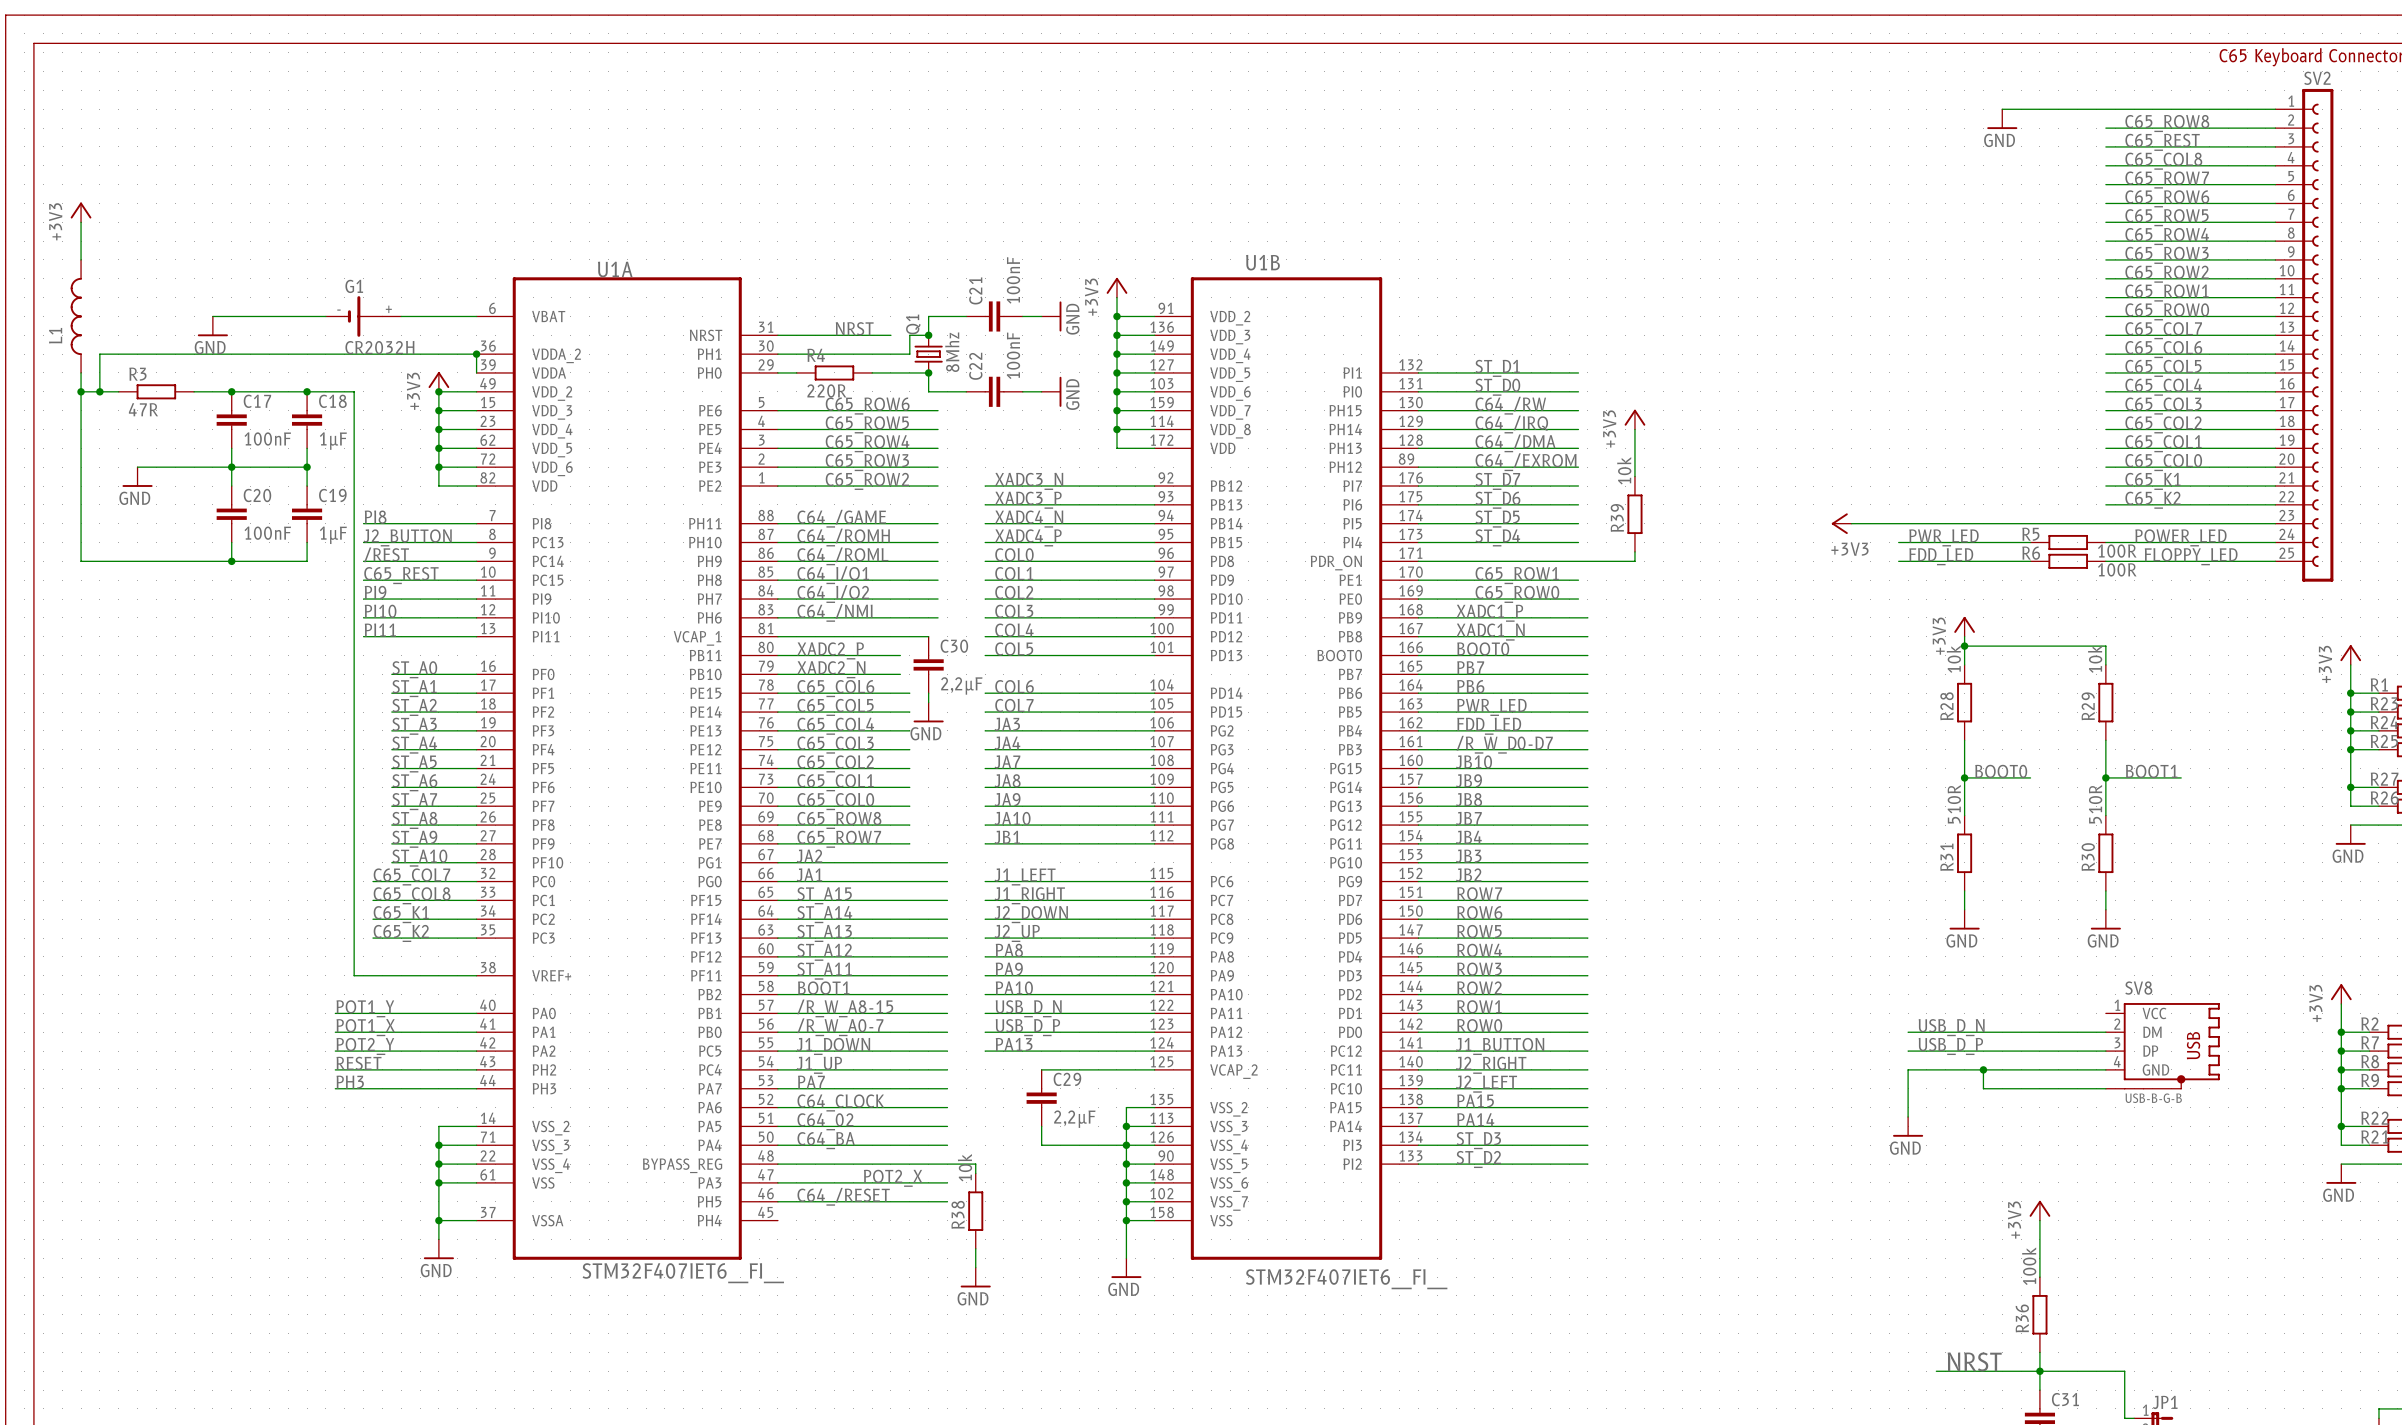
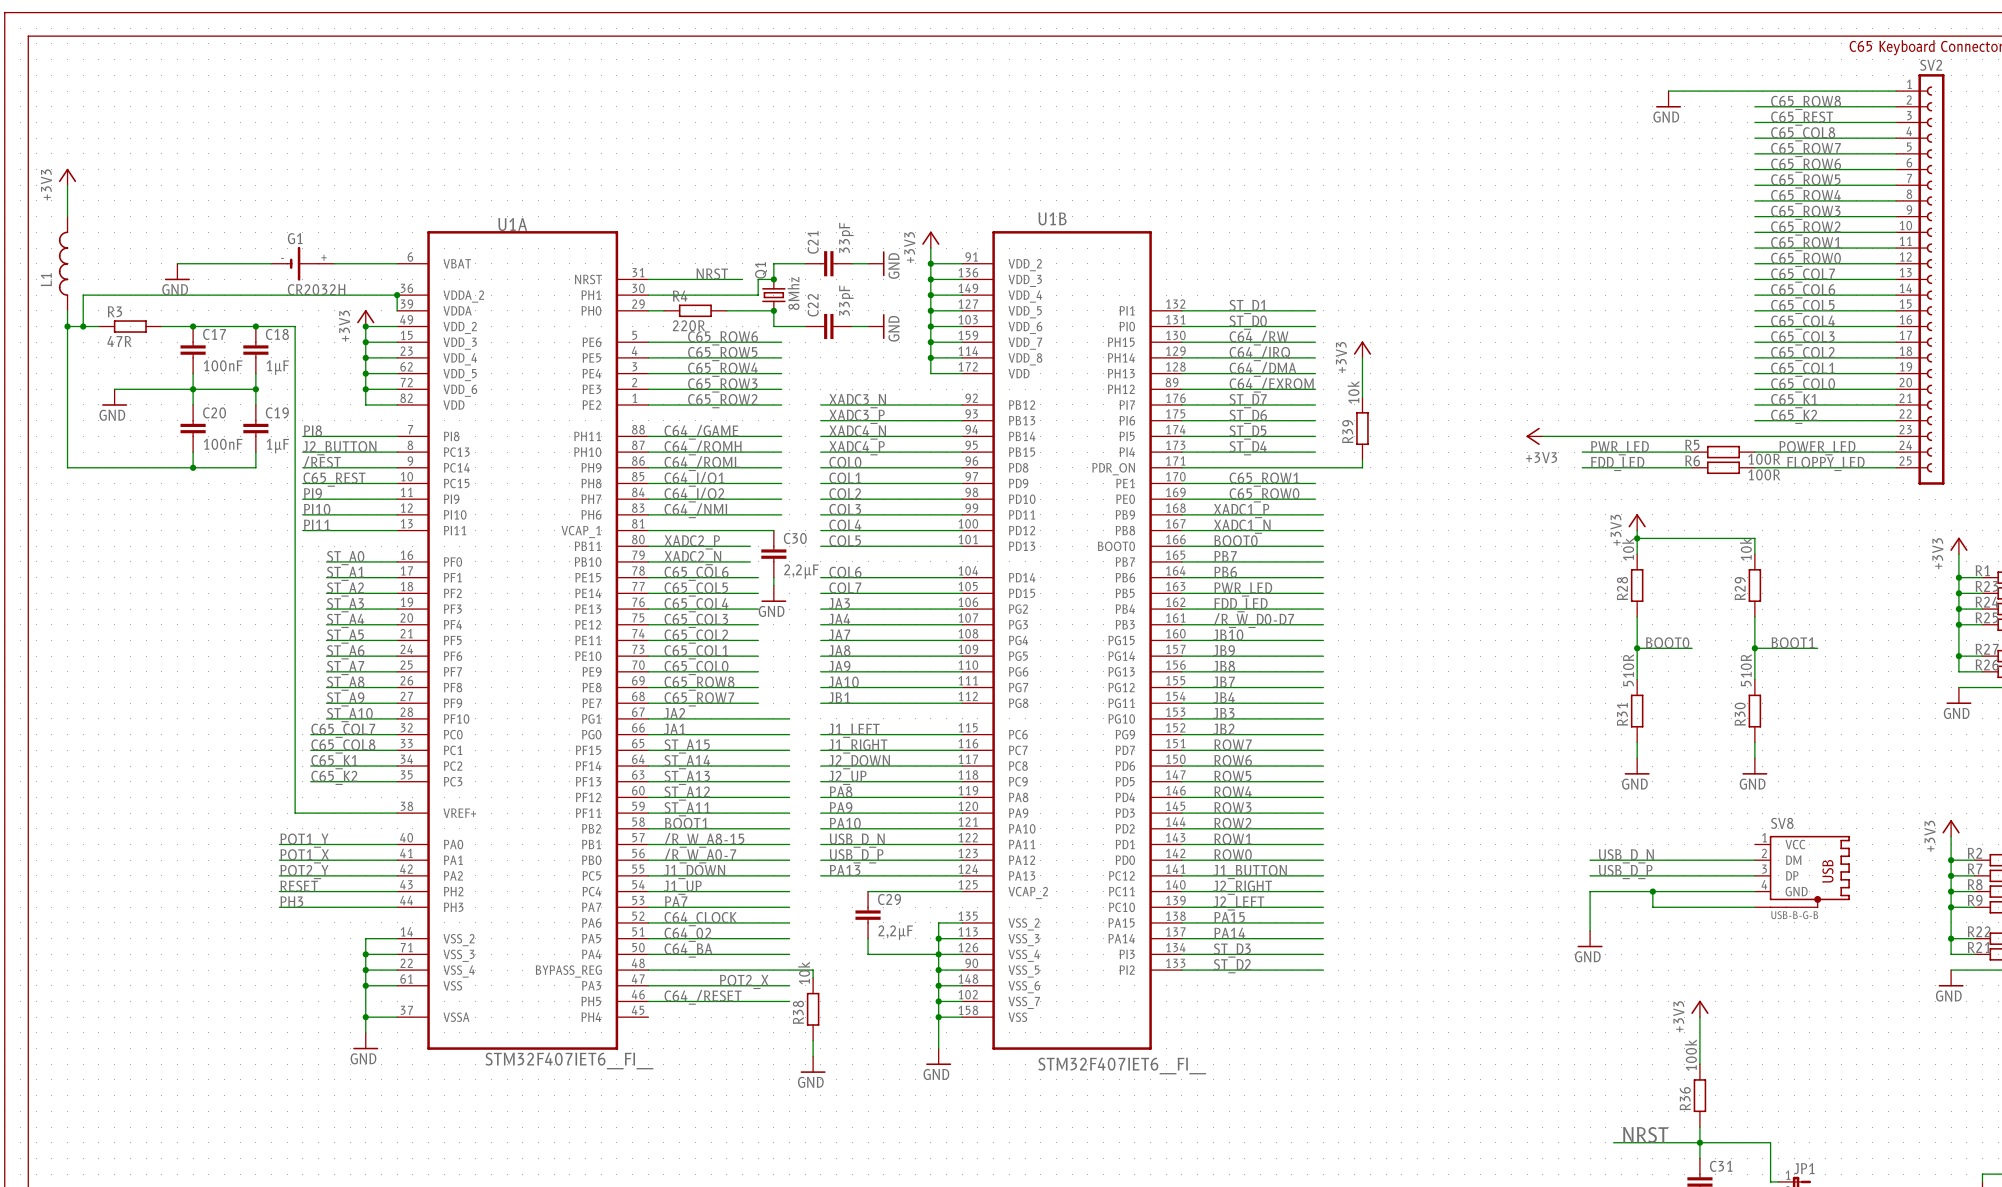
C21 value: 100nF (1013, 280) -> 33pF (846, 237)
C22 value: 100nF (1013, 355) -> 33pF (846, 300)

